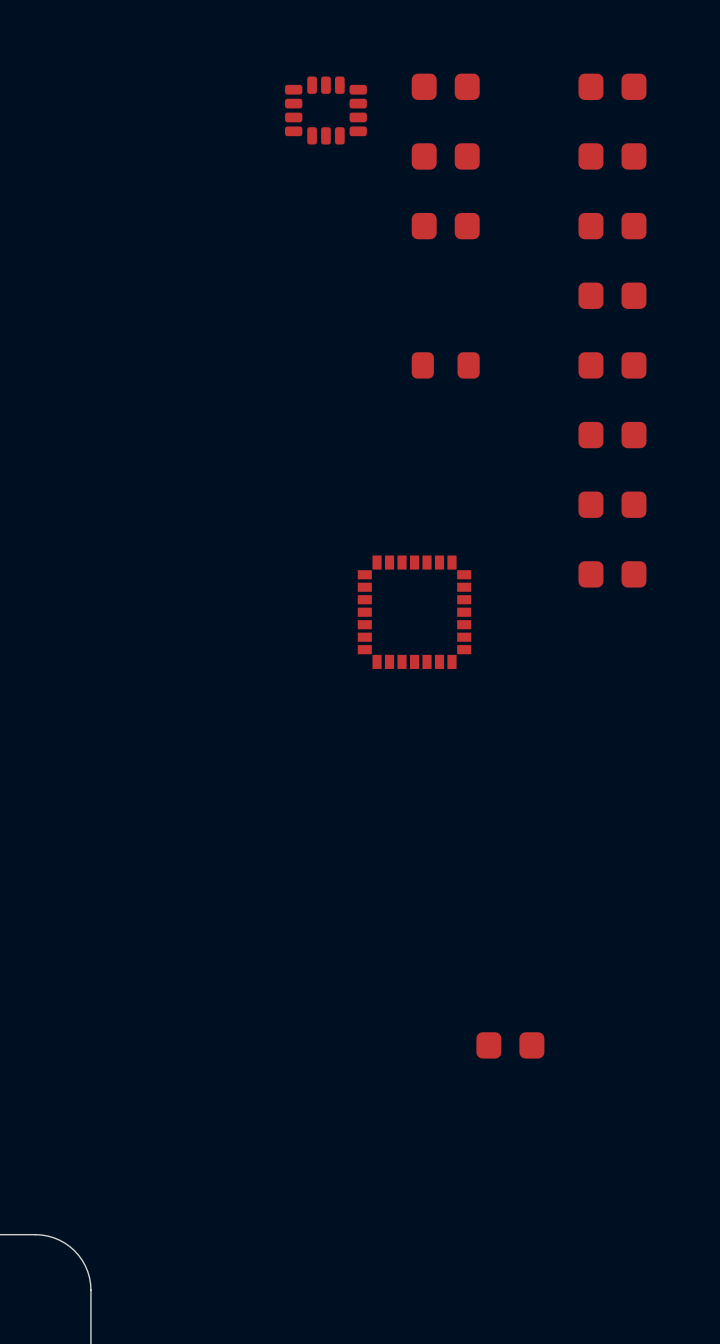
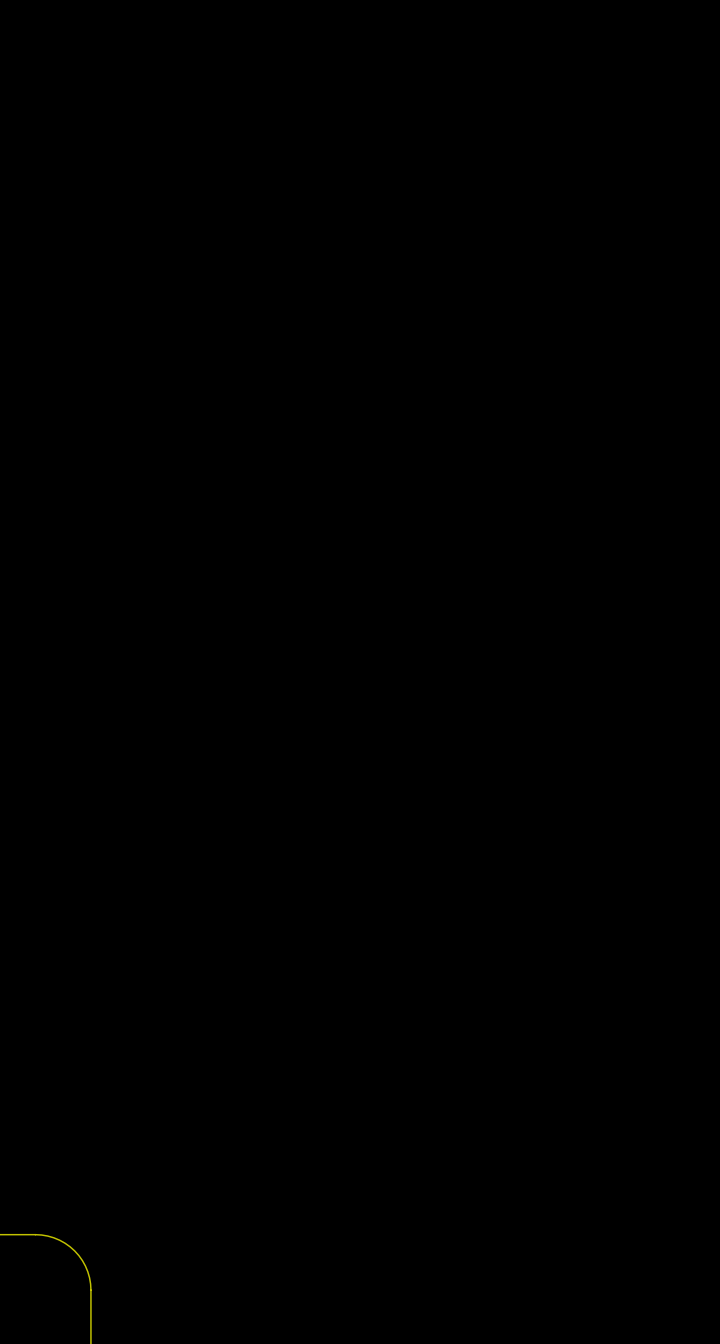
part: (445, 86) -> none
part: (612, 86) -> none
part: (325, 110) -> none
part: (445, 156) -> none
part: (612, 156) -> none
part: (445, 226) -> none
part: (612, 226) -> none
part: (612, 295) -> none
part: (445, 365) -> none
part: (612, 365) -> none
part: (612, 435) -> none
part: (612, 504) -> none
part: (612, 574) -> none
part: (414, 612) -> none
part: (510, 1045) -> none

